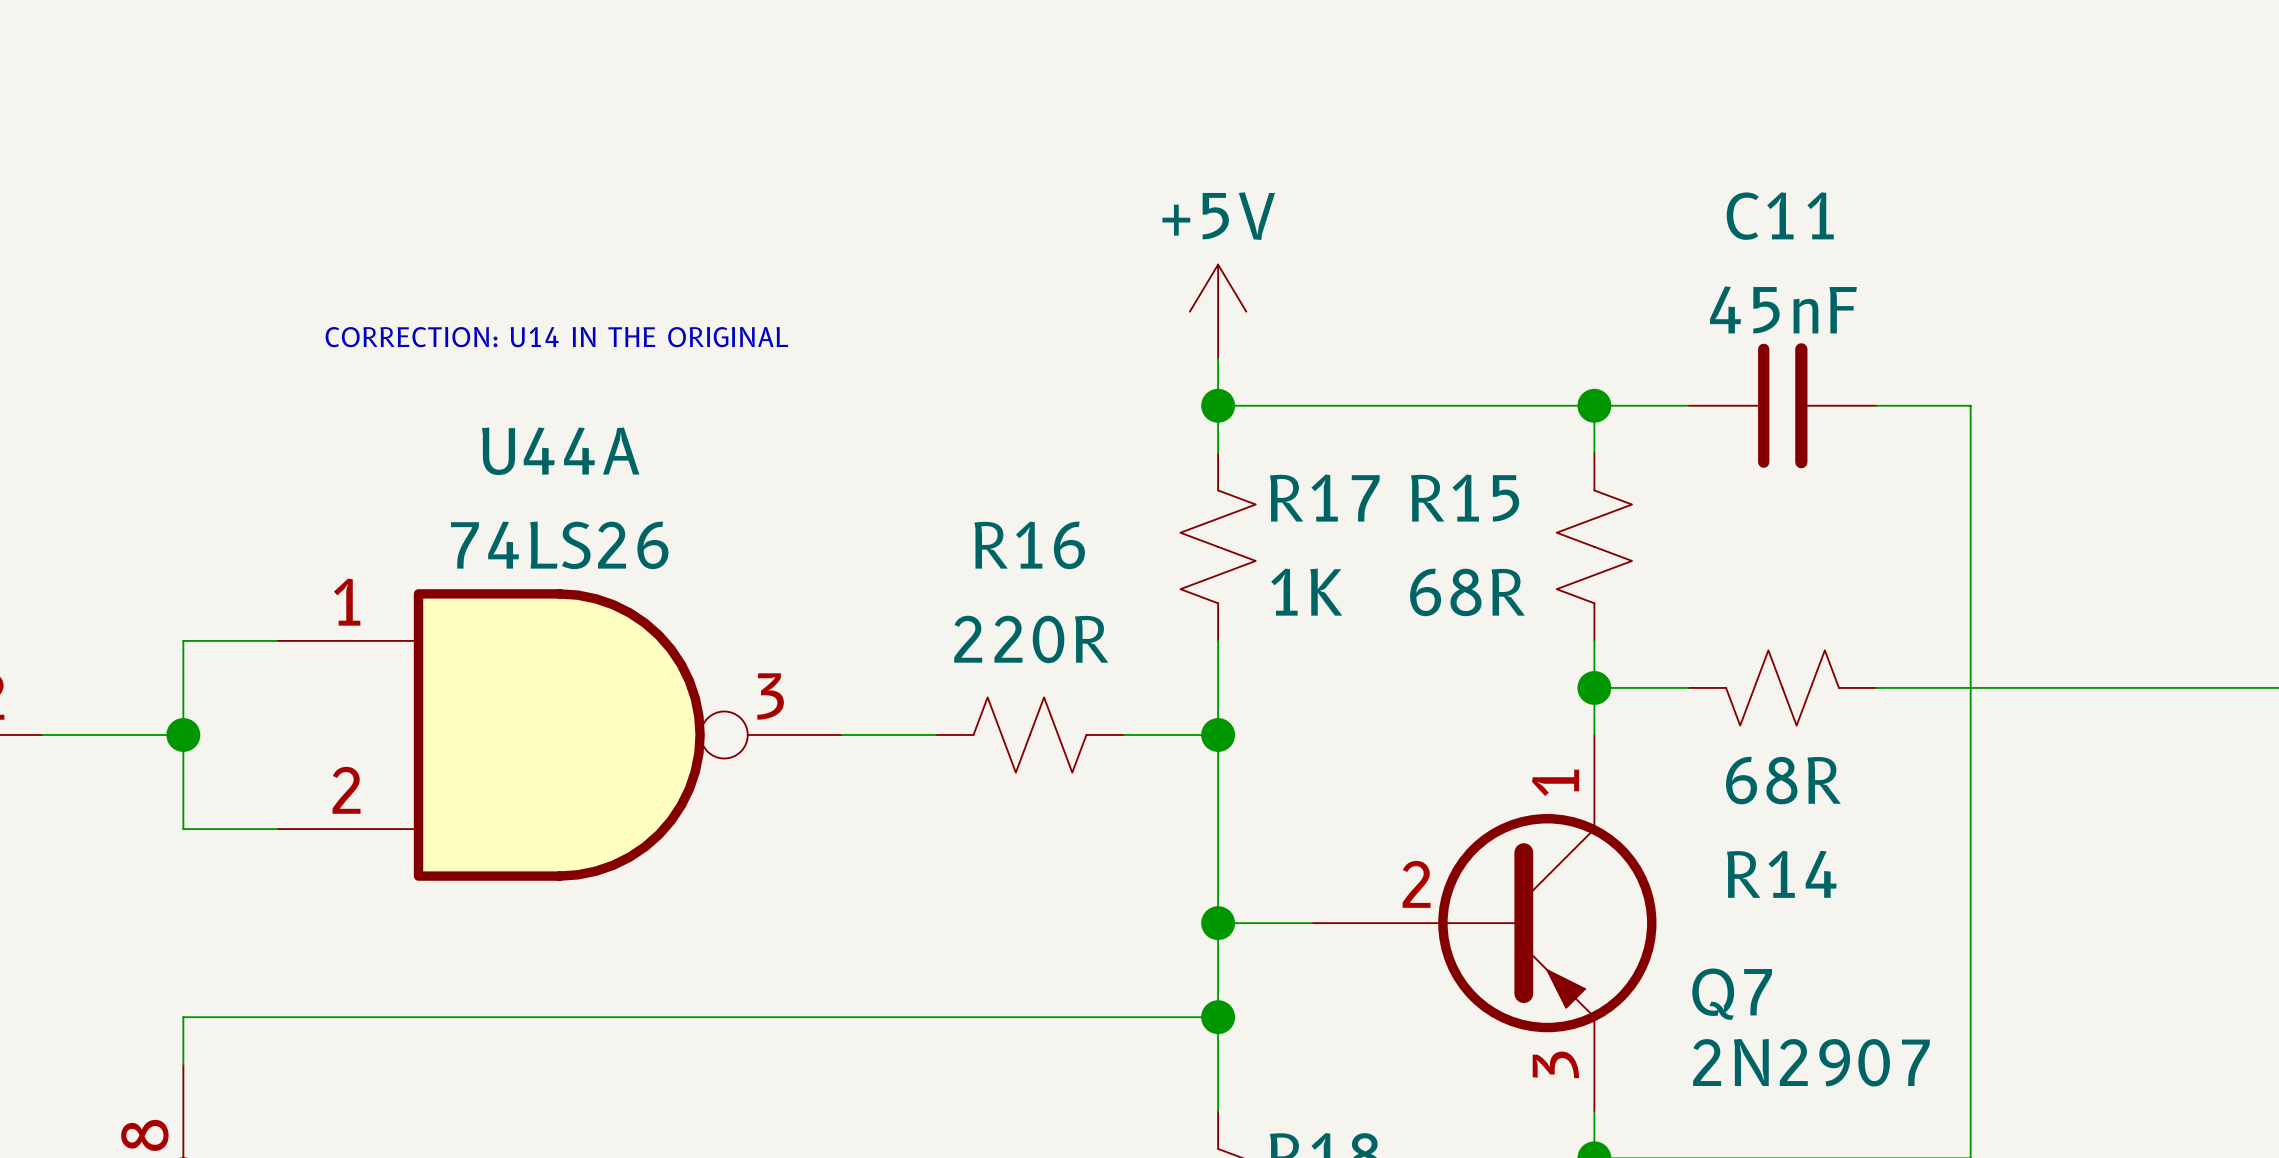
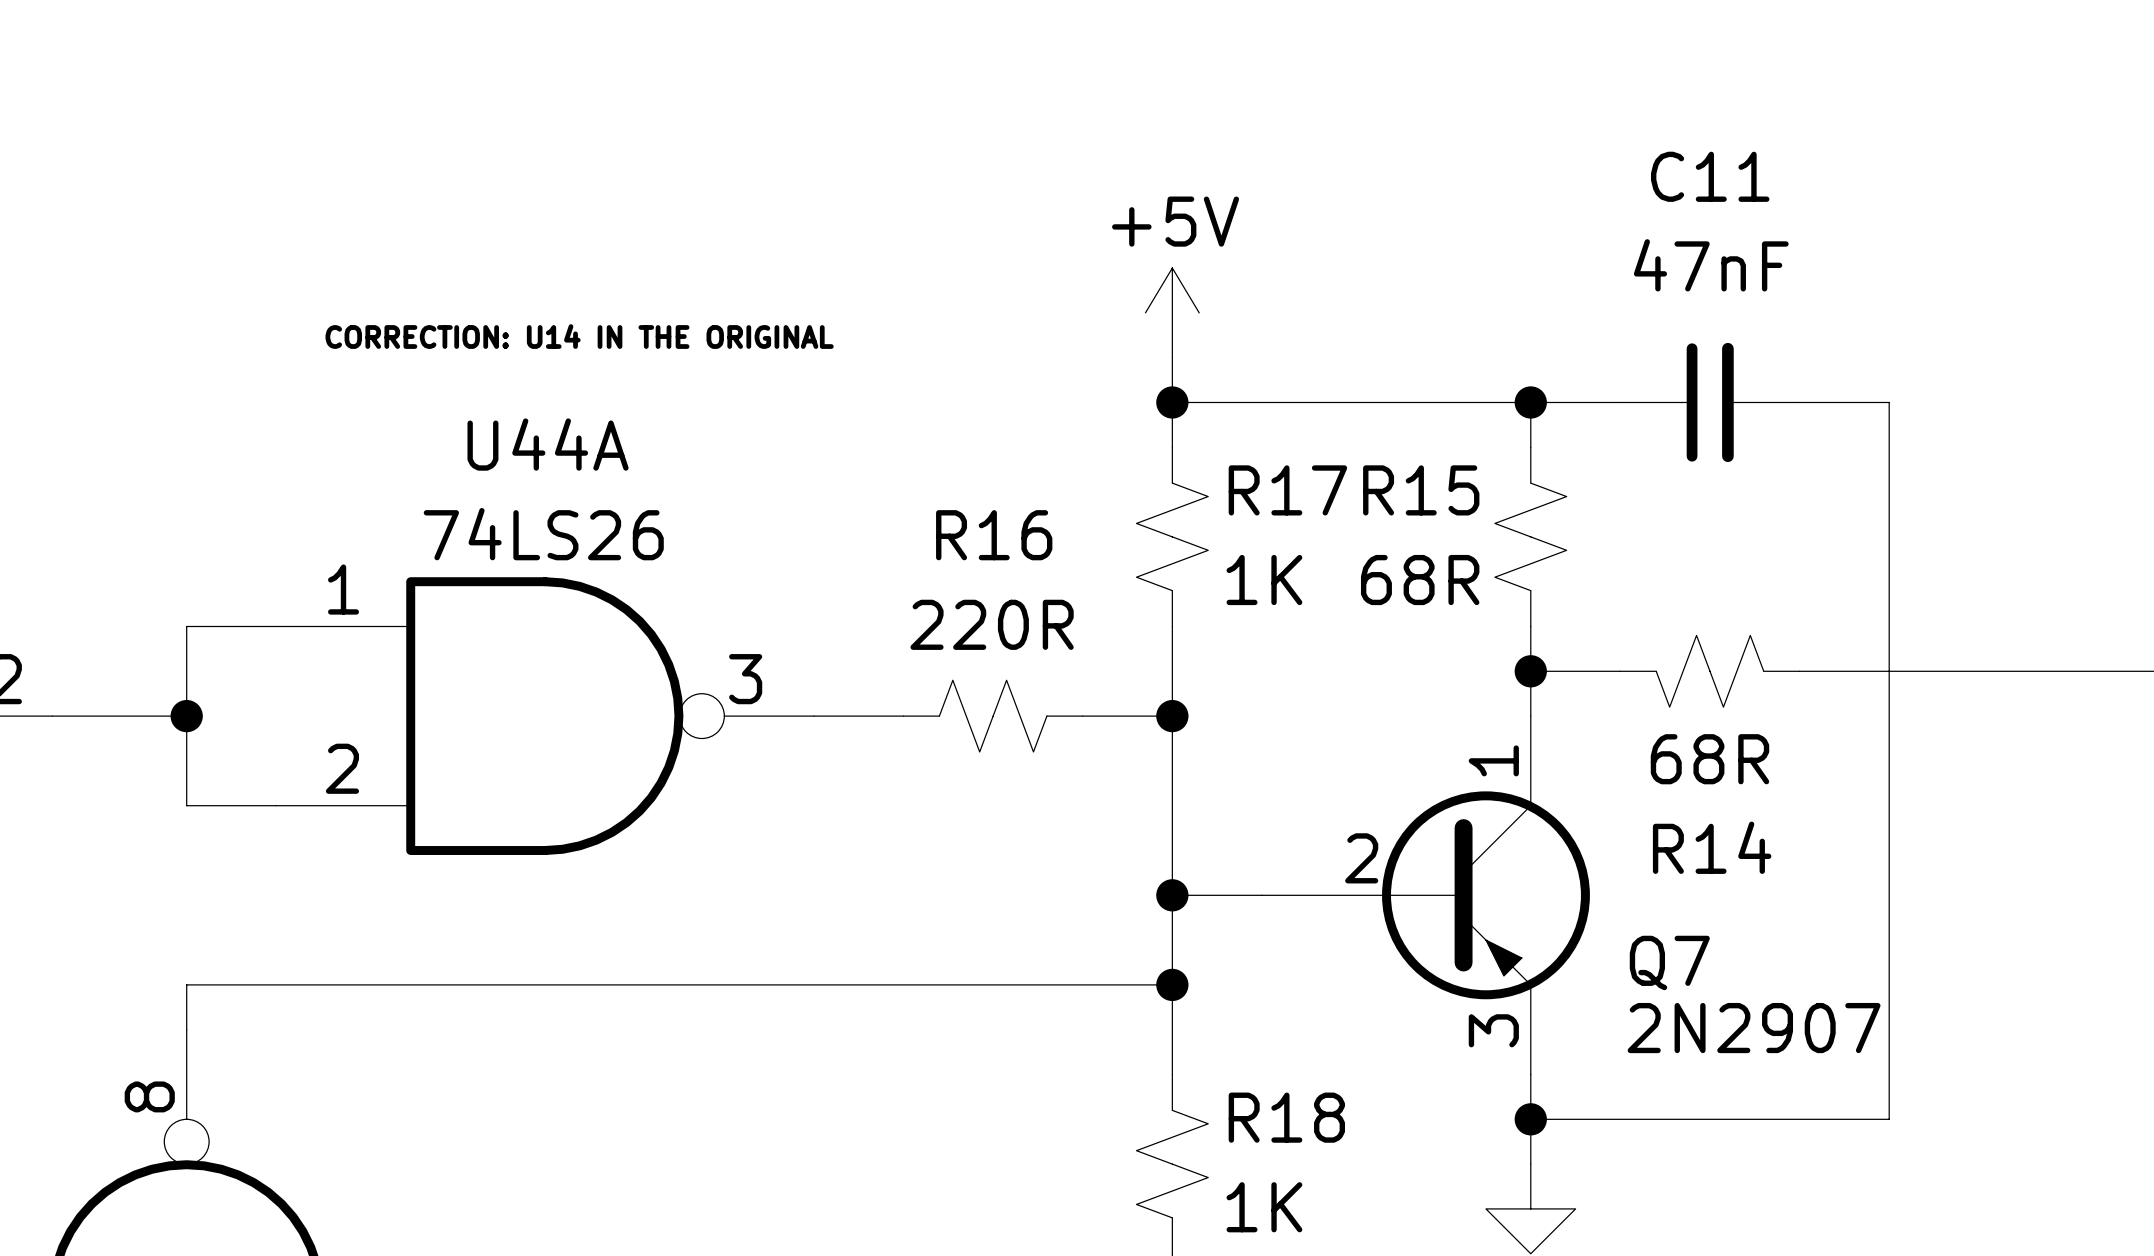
C11 name position: C11 (1780, 216) -> C11 (1710, 176)
C11 value: 45nF (1783, 309) -> 47nF (1711, 265)

